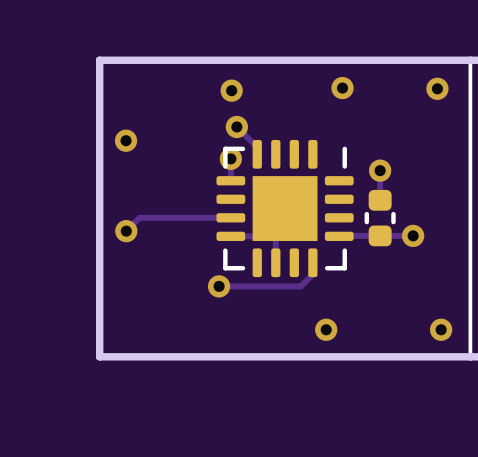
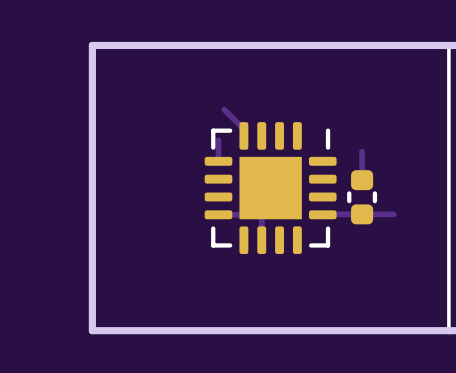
via: (342, 88) -> none
via: (437, 88) -> none
via: (231, 90) -> none
via: (236, 126) -> none
via: (126, 140) -> none
via: (230, 158) -> none
via: (380, 170) -> none
track: (230, 217) (139, 217) (126, 231) -> none
via: (126, 231) -> none
via: (413, 235) -> none
track: (312, 262) (312, 274) (300, 286) (219, 286) -> none
via: (219, 286) -> none
via: (326, 329) -> none
via: (441, 329) -> none

